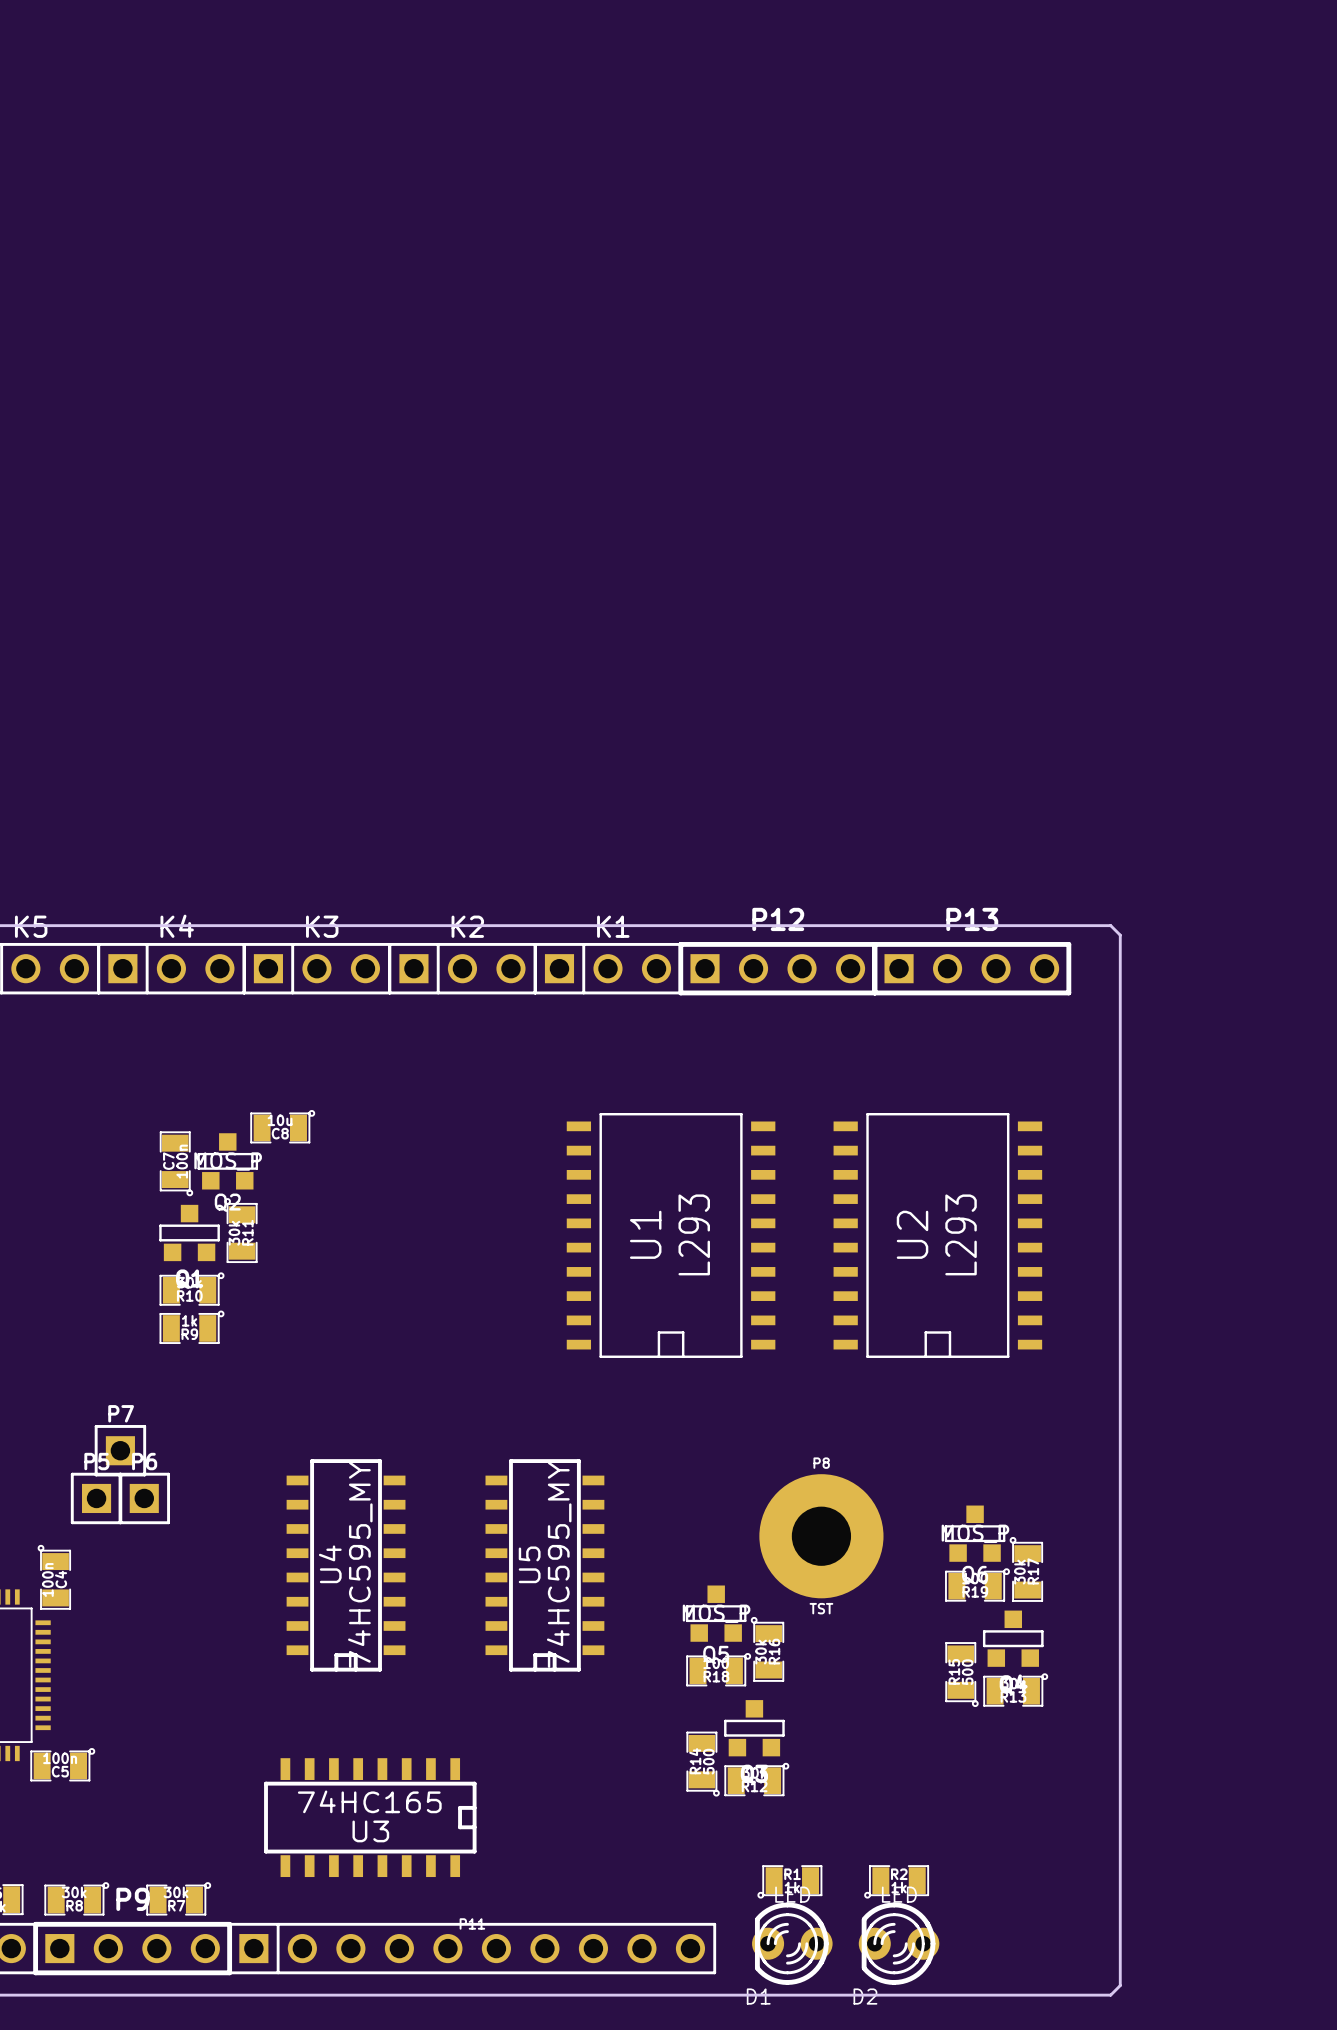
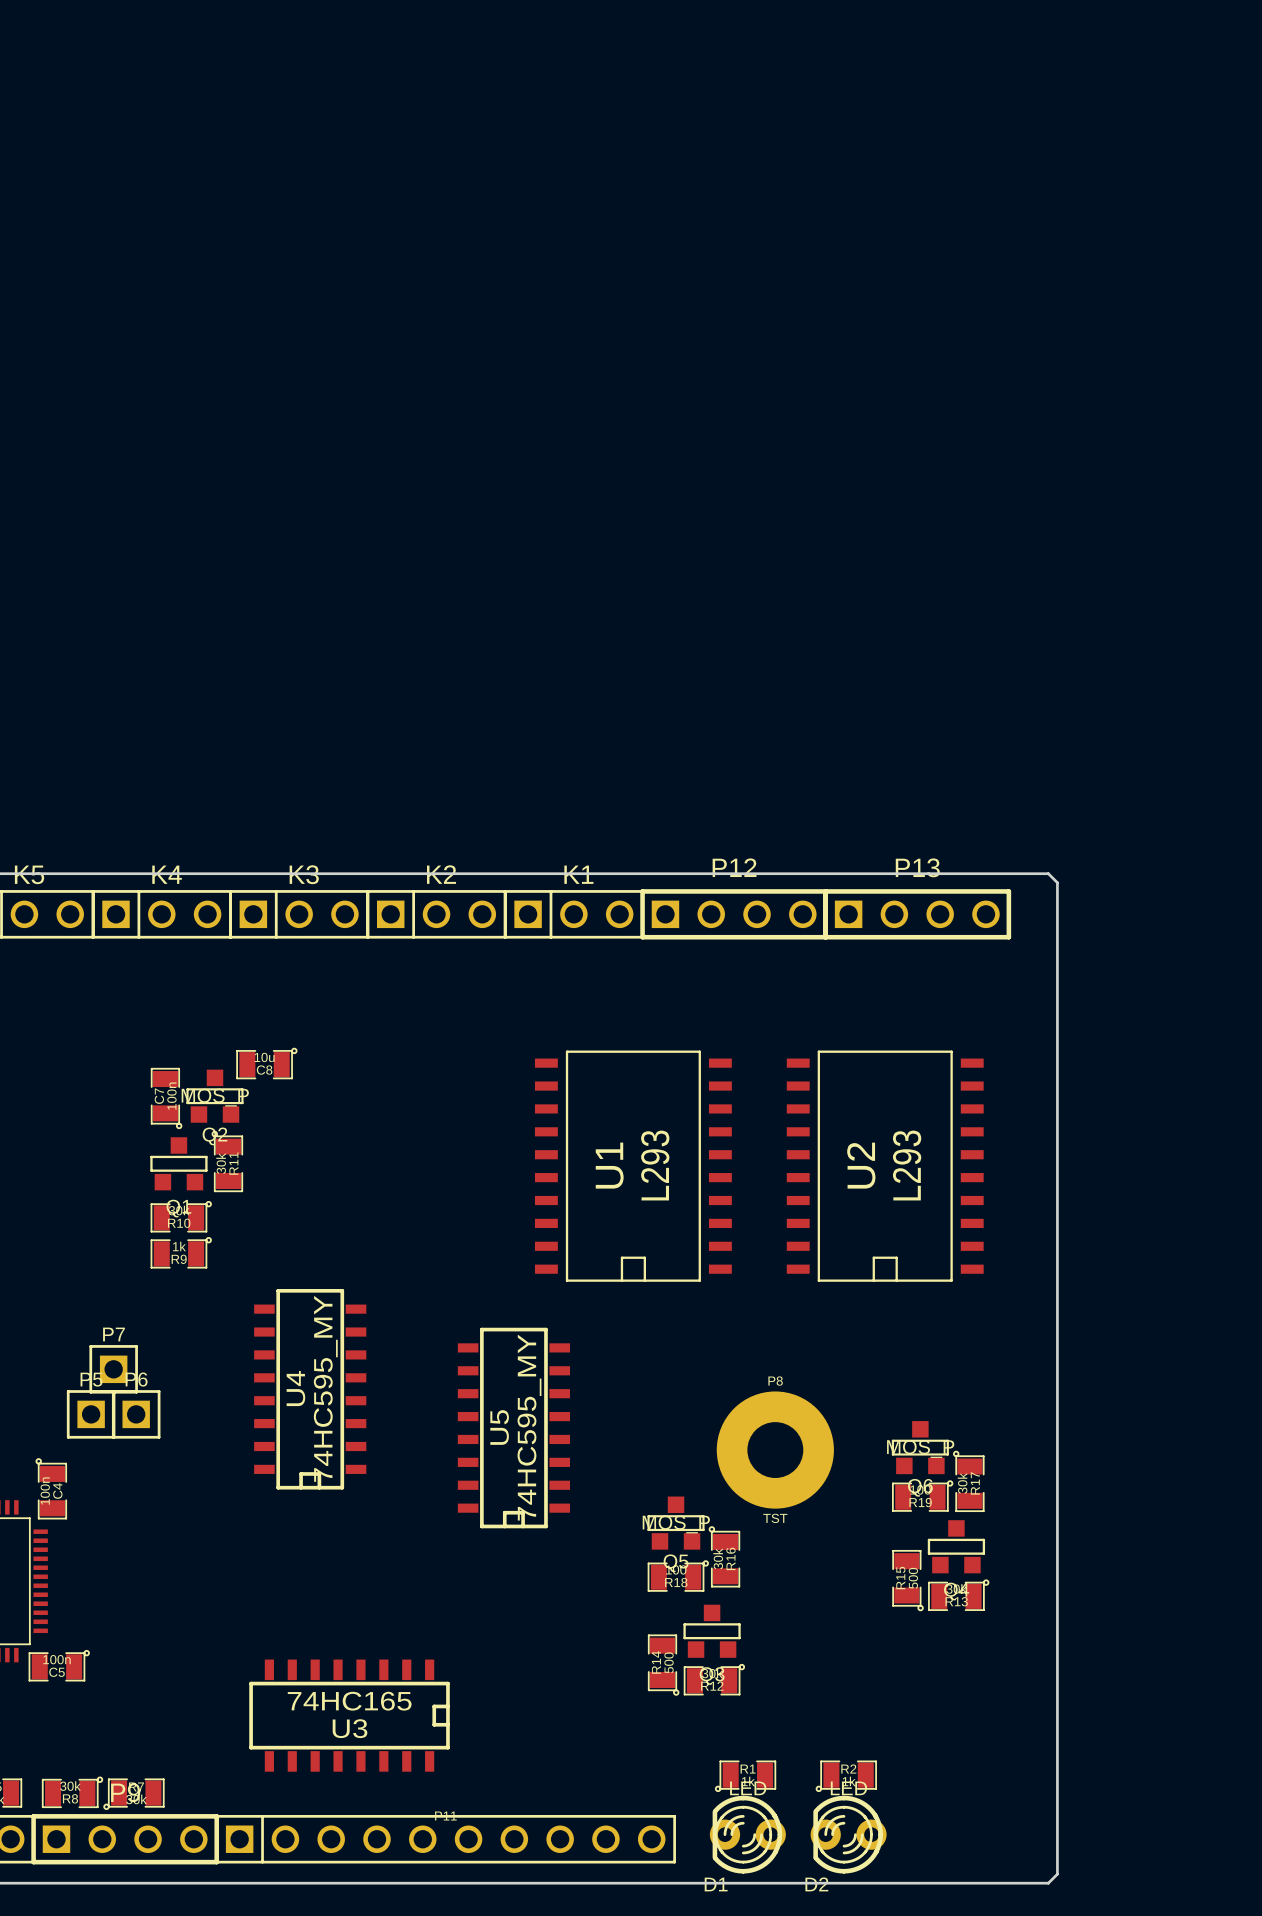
U4 position: (346, 1565) -> (310, 1389)
U5 position: (544, 1565) -> (513, 1428)
R7 rotation: 0° (178, 1898) -> 180° (133, 1794)

